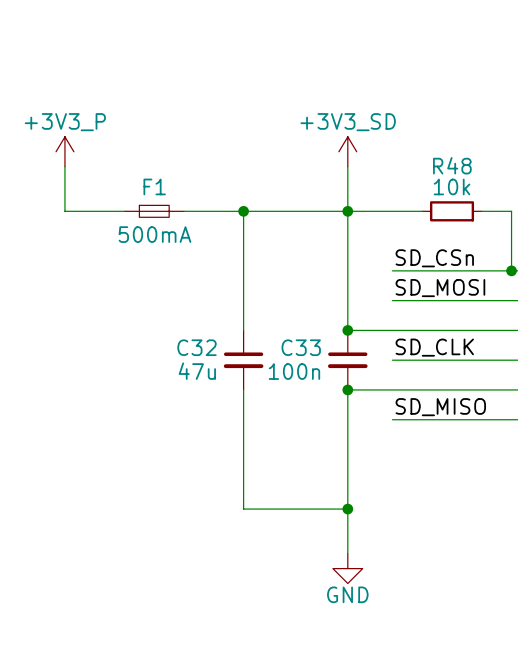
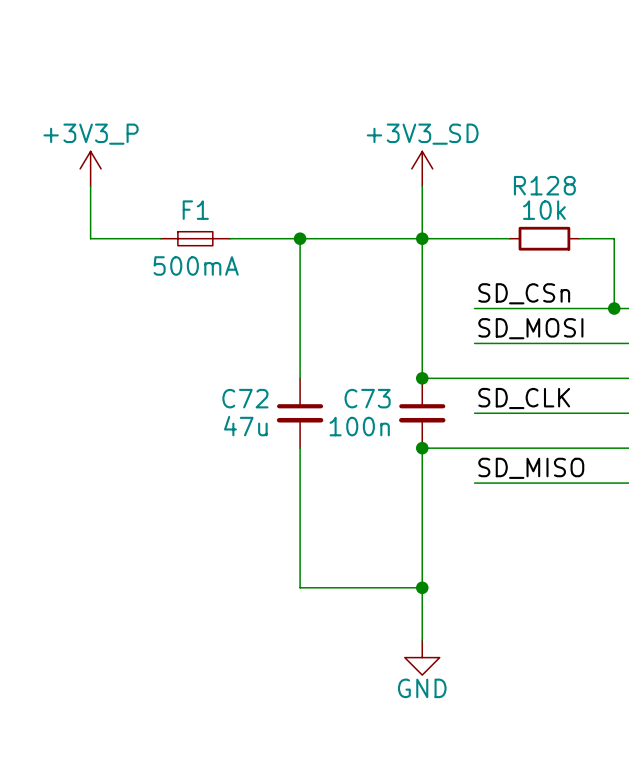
R48 name: R48 (452, 165) -> R128 (544, 185)
C32 name: C32 (196, 347) -> C72 (245, 398)
C33 name: C33 (301, 347) -> C73 (367, 398)

